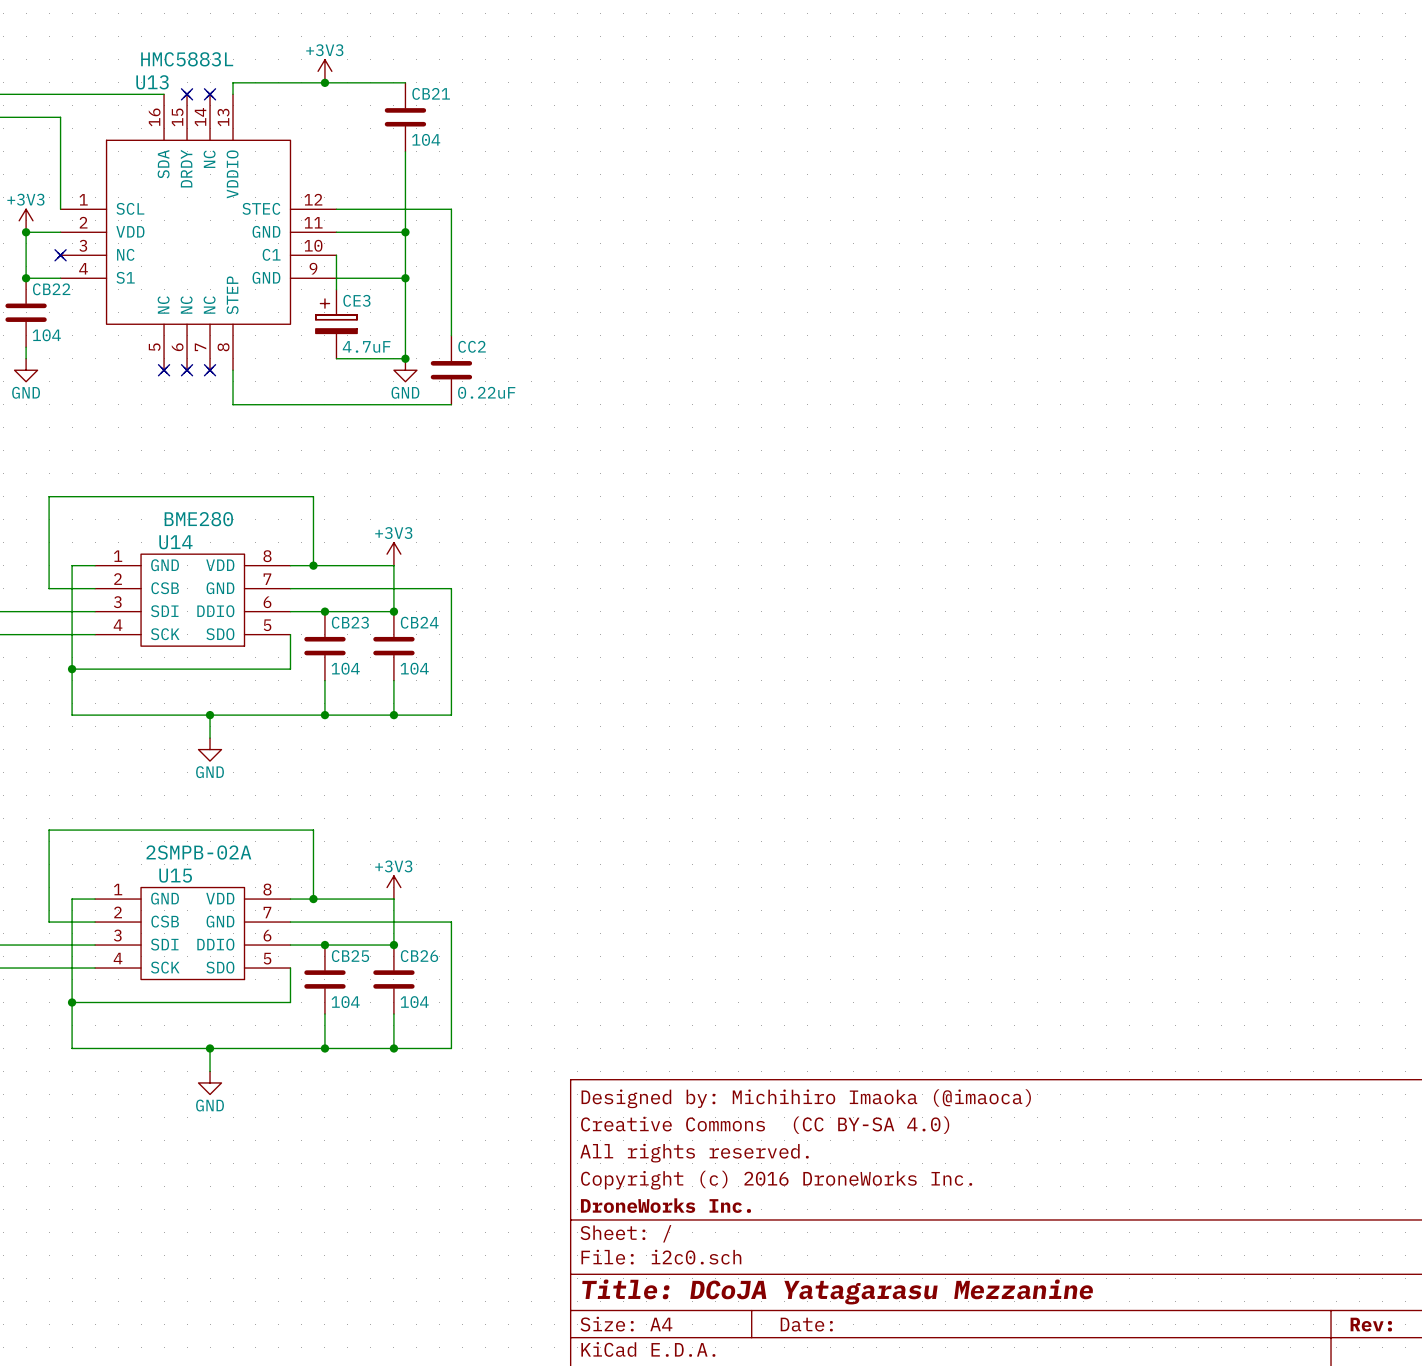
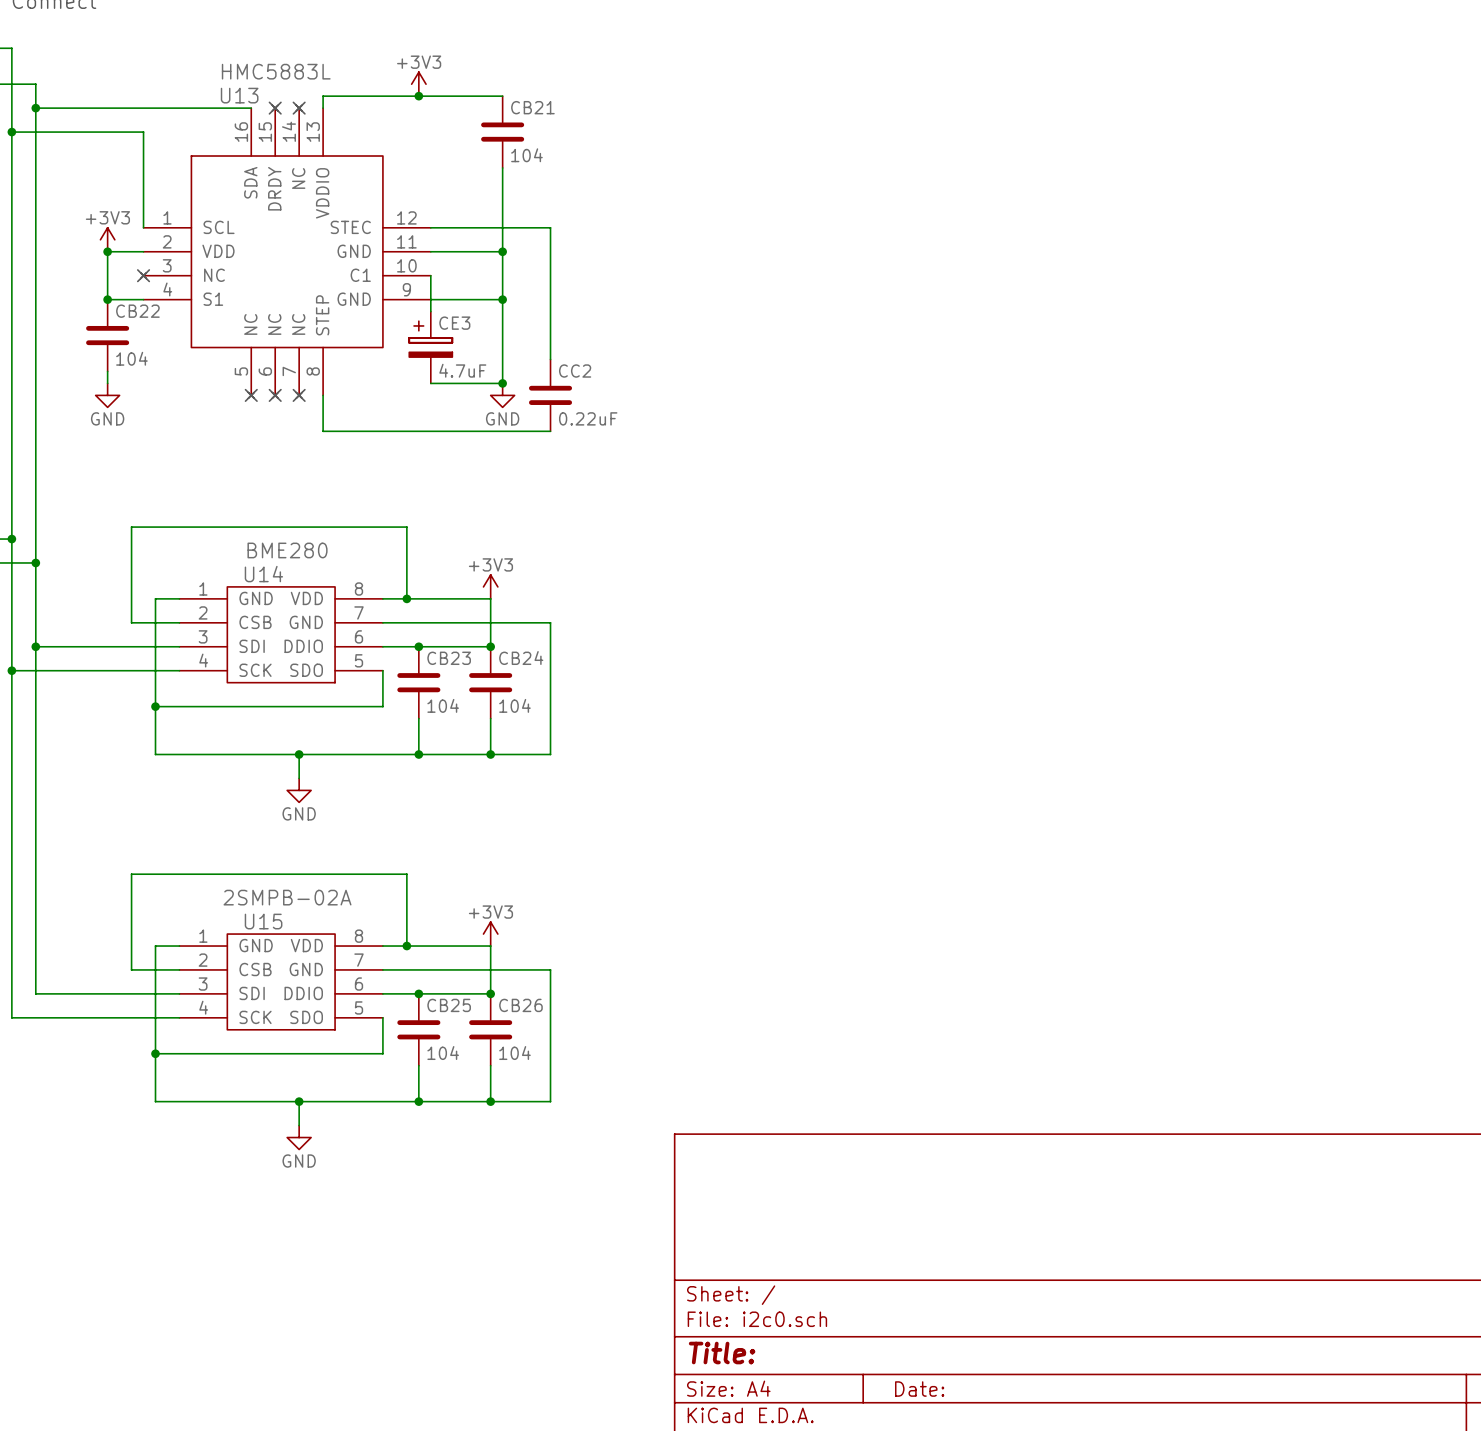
title block: Designed by: Michihiro Imaoka (@imaoca) (806, 1098) -> none
title block: Creative Commons (CC BY-SA 4.0) (765, 1125) -> none
title block: All rights reserved. (694, 1153) -> none
title block: Copyright (c) 2016 DroneWorks Inc. (776, 1180) -> none
title block: DroneWorks Inc. (665, 1205) -> none
title block: Title: DCoJA Yatagarasu Mezzanine (837, 1291) -> Title: (722, 1353)

